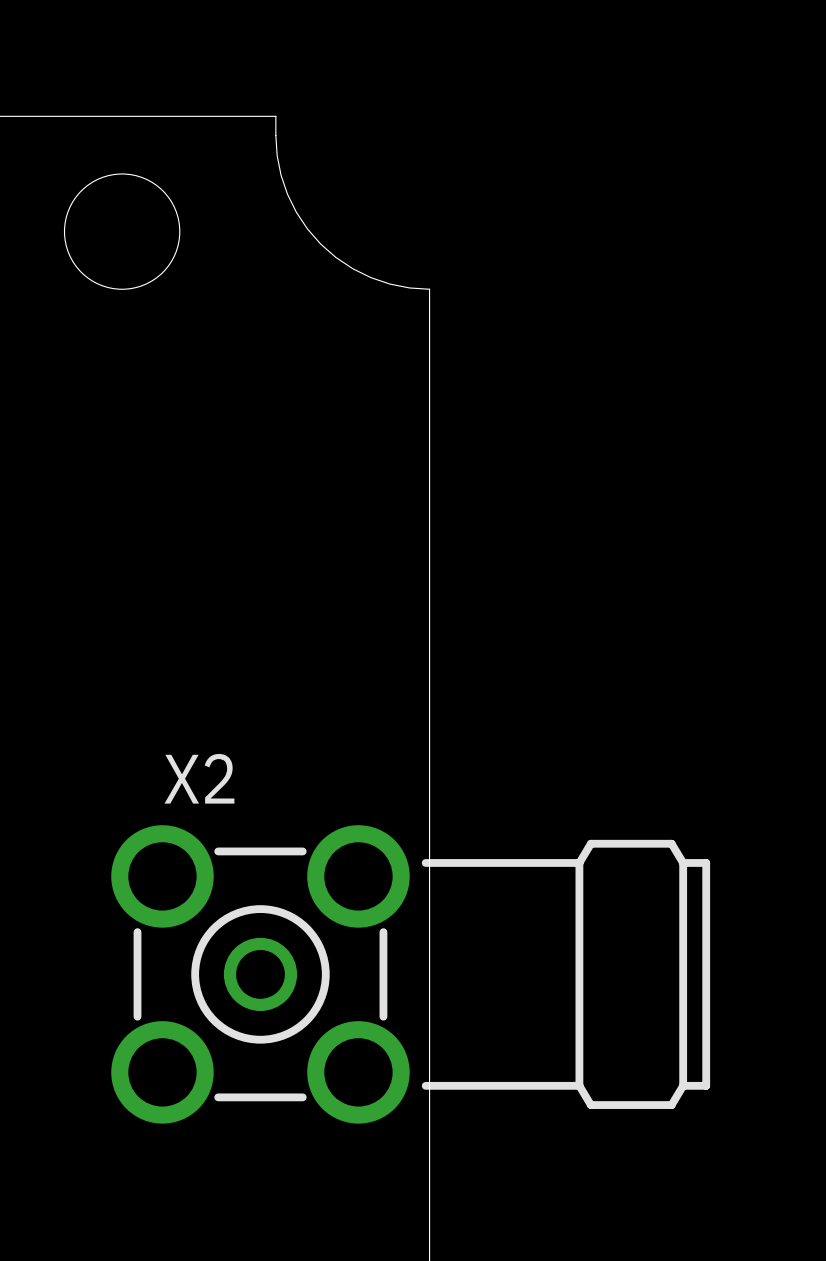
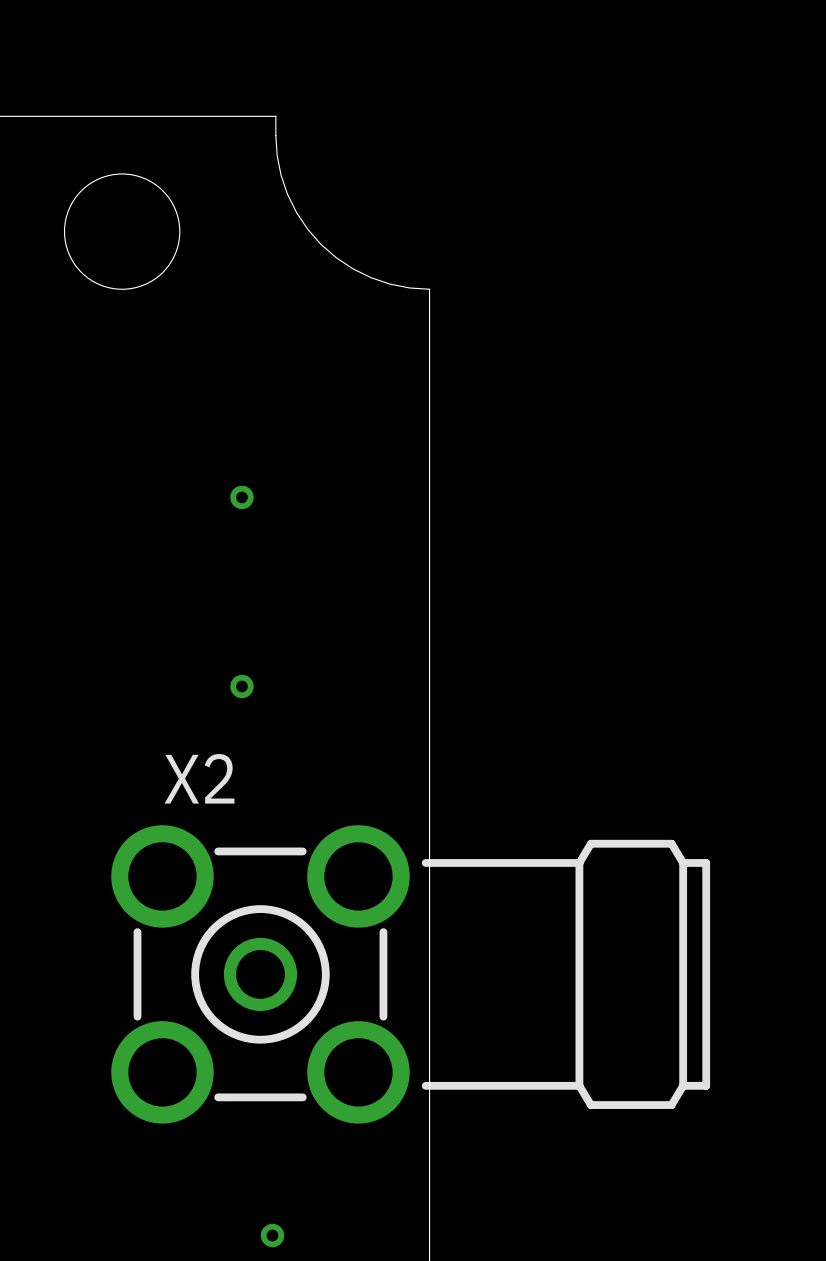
via: none -> (241, 497)
via: none -> (241, 686)
via: none -> (272, 1235)

